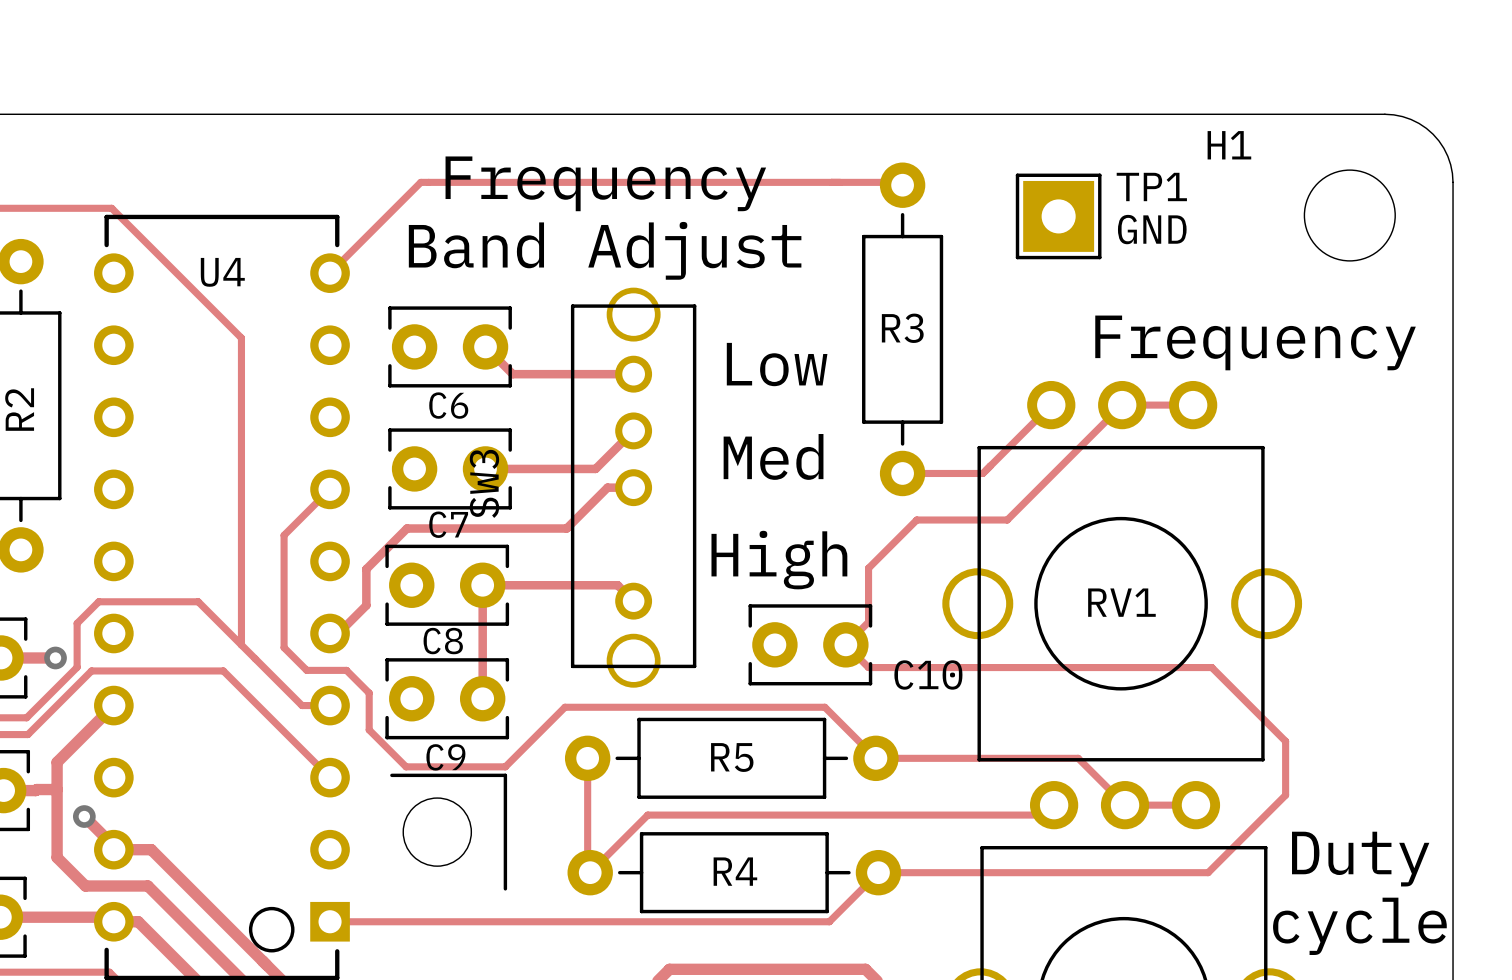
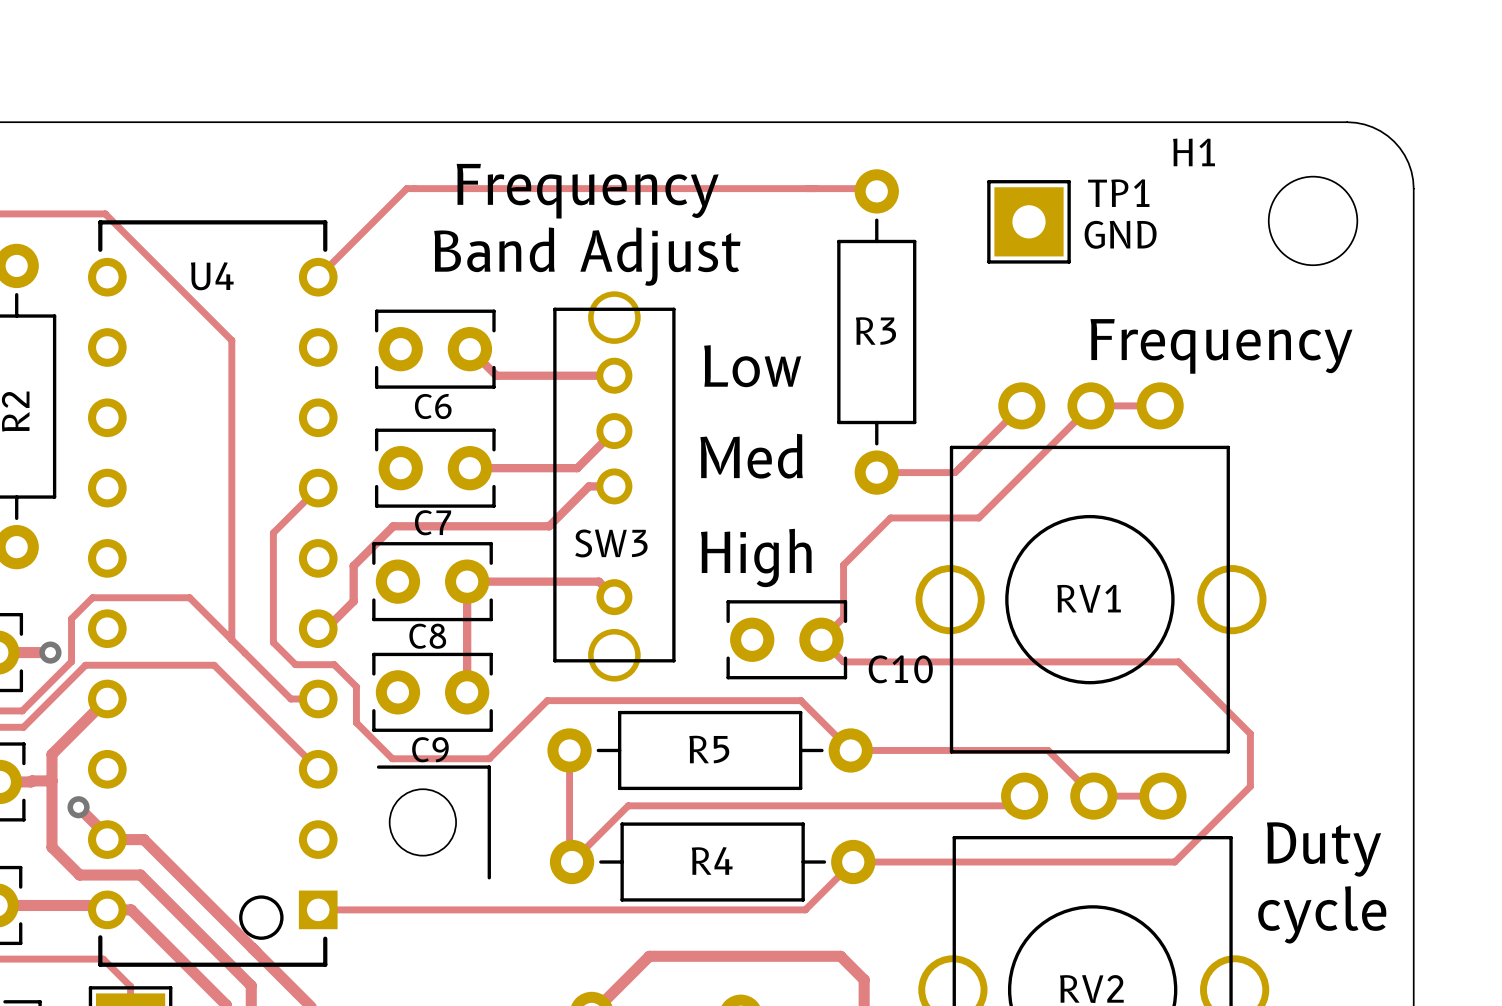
SW3 name rotation: 0° (484, 483) -> 90° clockwise (611, 543)
SW3 name position: SW3 (484, 483) -> SW3 (611, 543)

